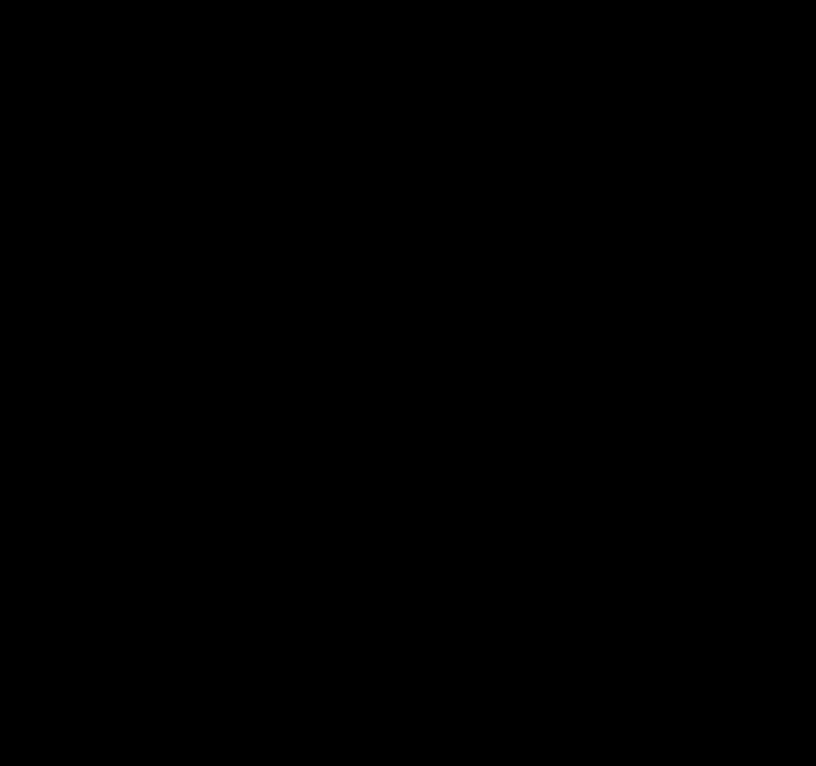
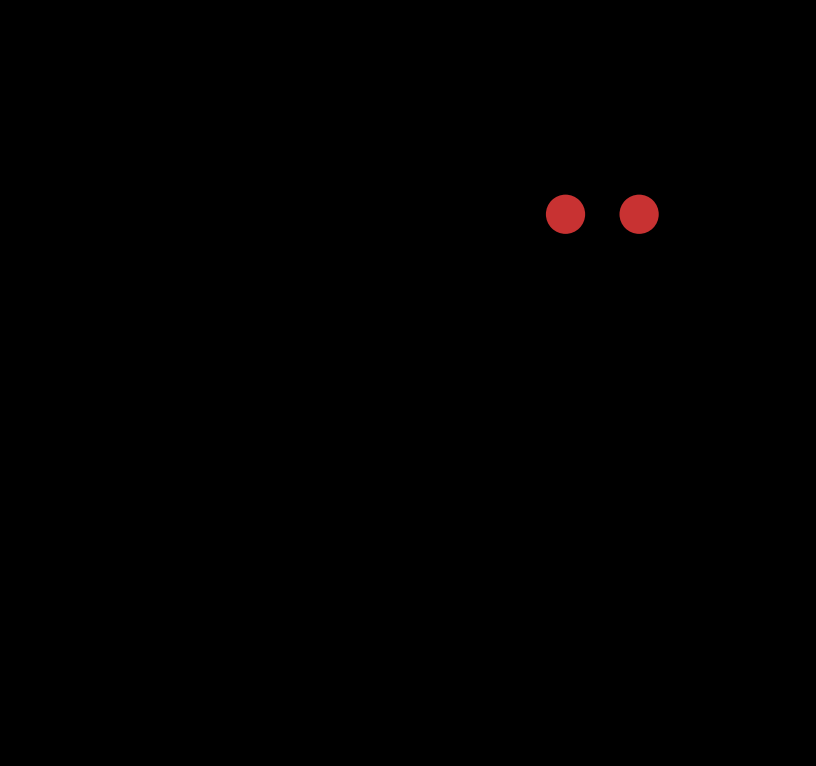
part: none -> (602, 214)

